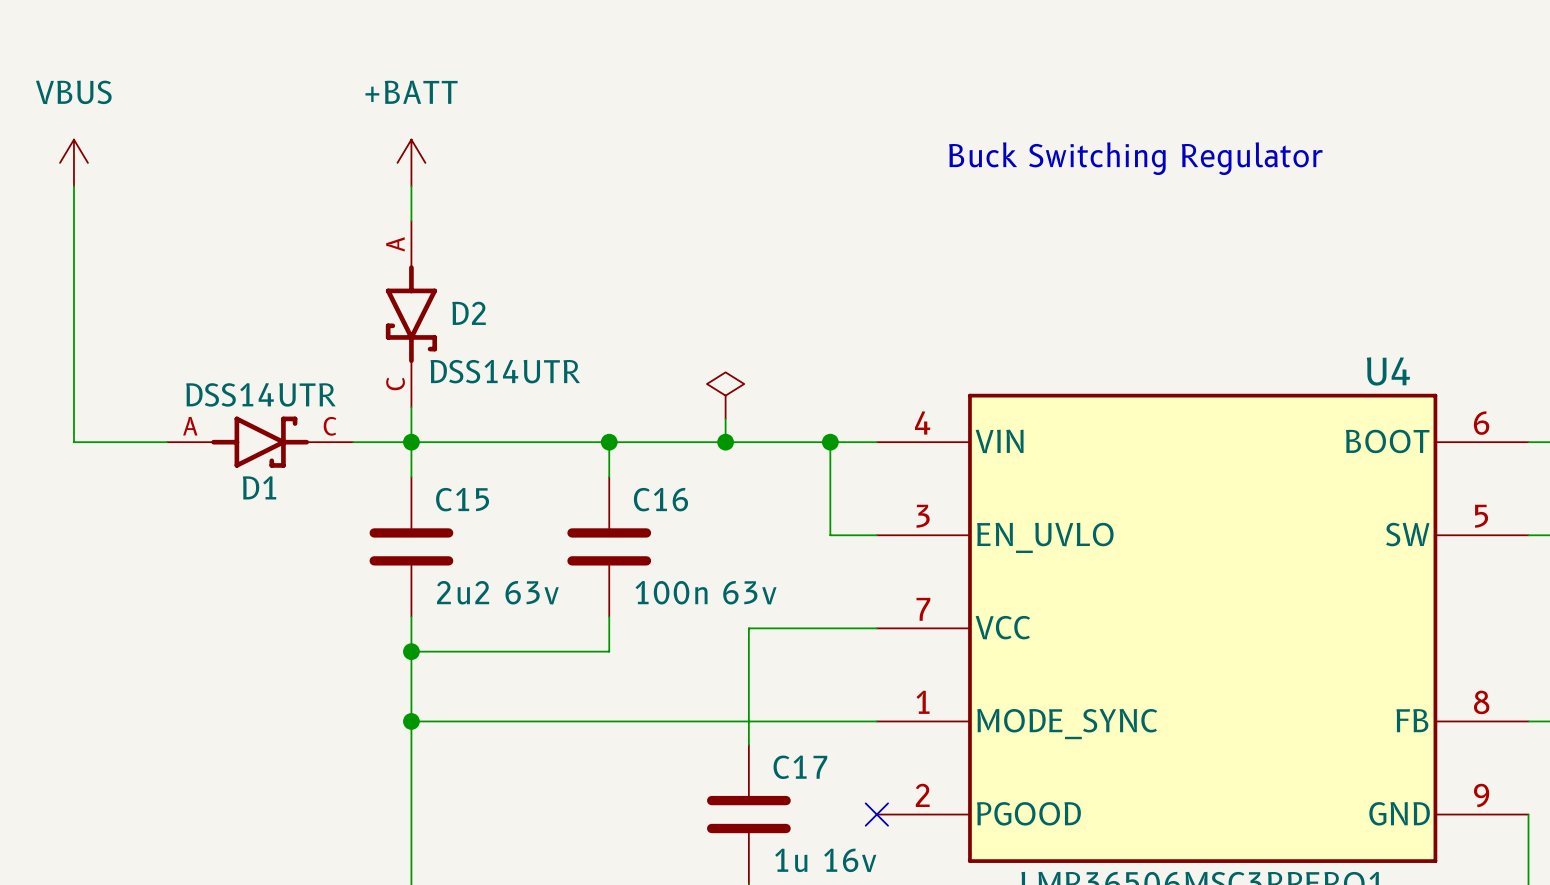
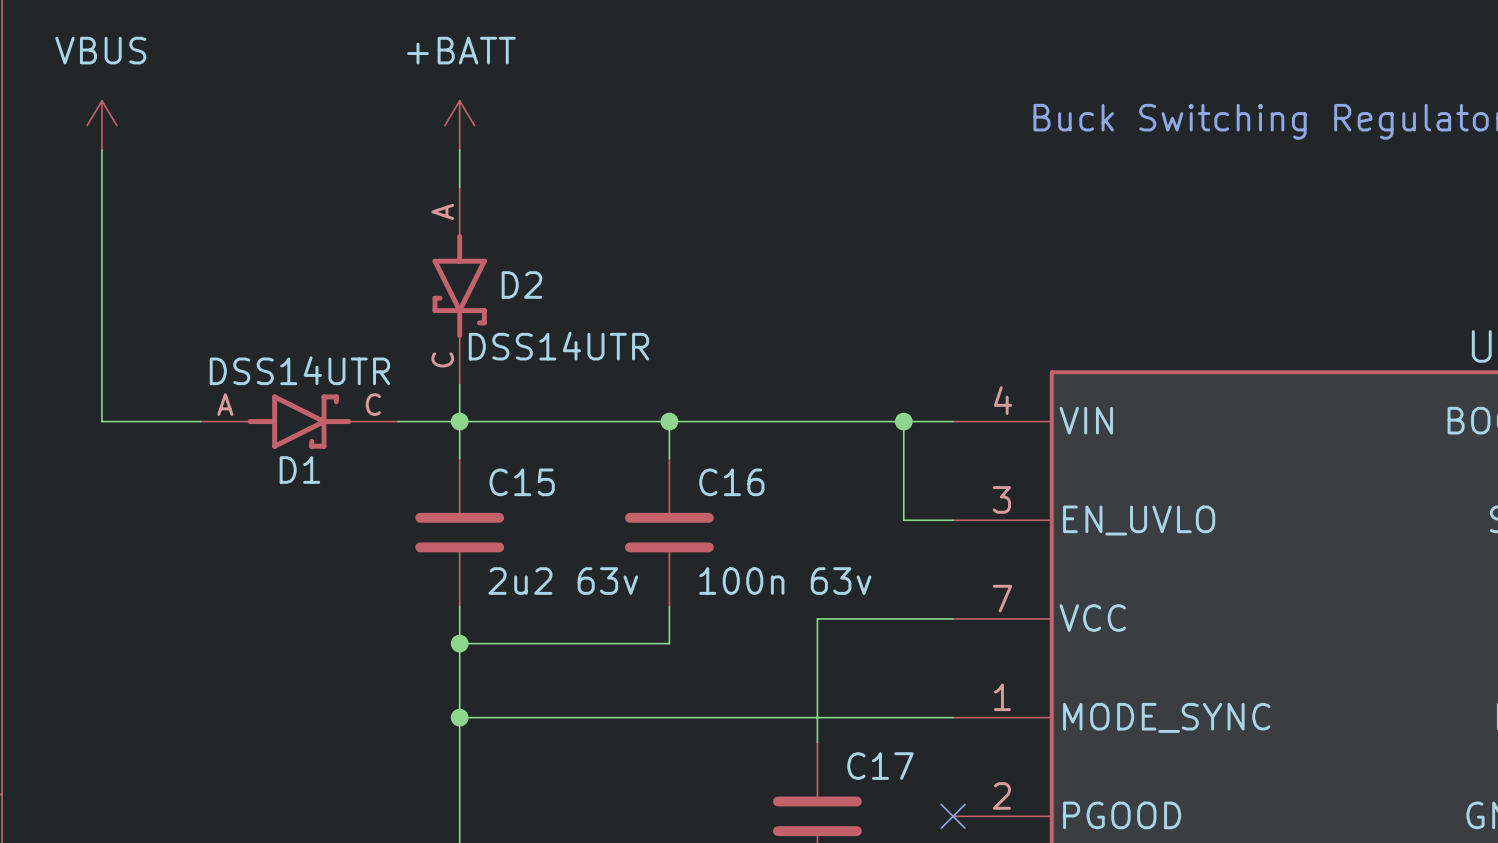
power symbol: (725, 395) -> none
wire: (725, 418) (725, 442) -> none
junction: (725, 442) -> none

